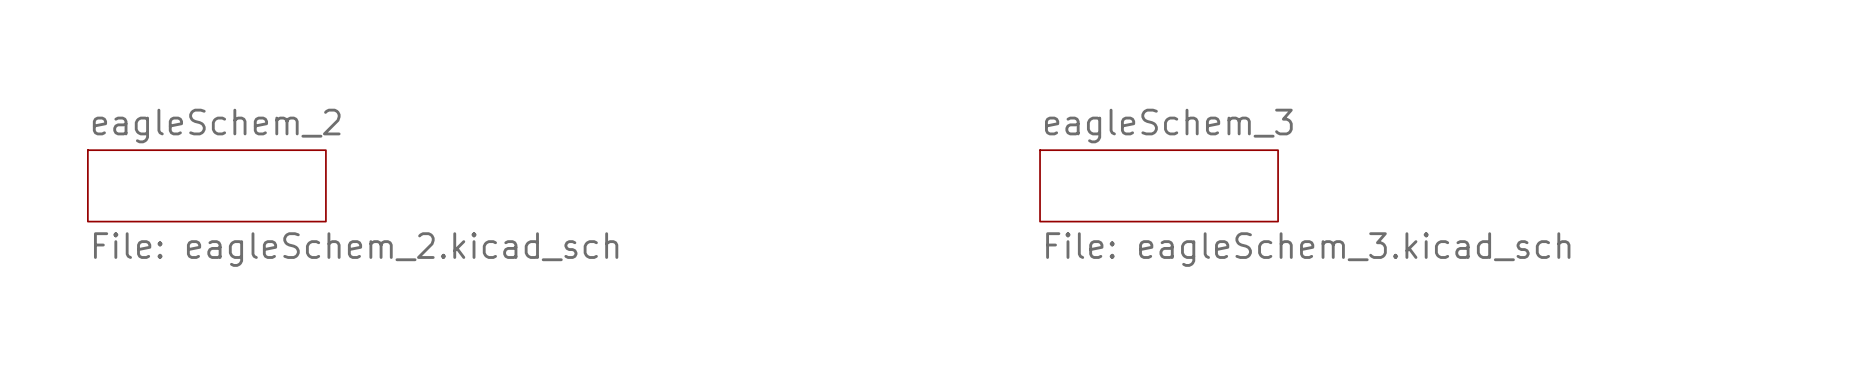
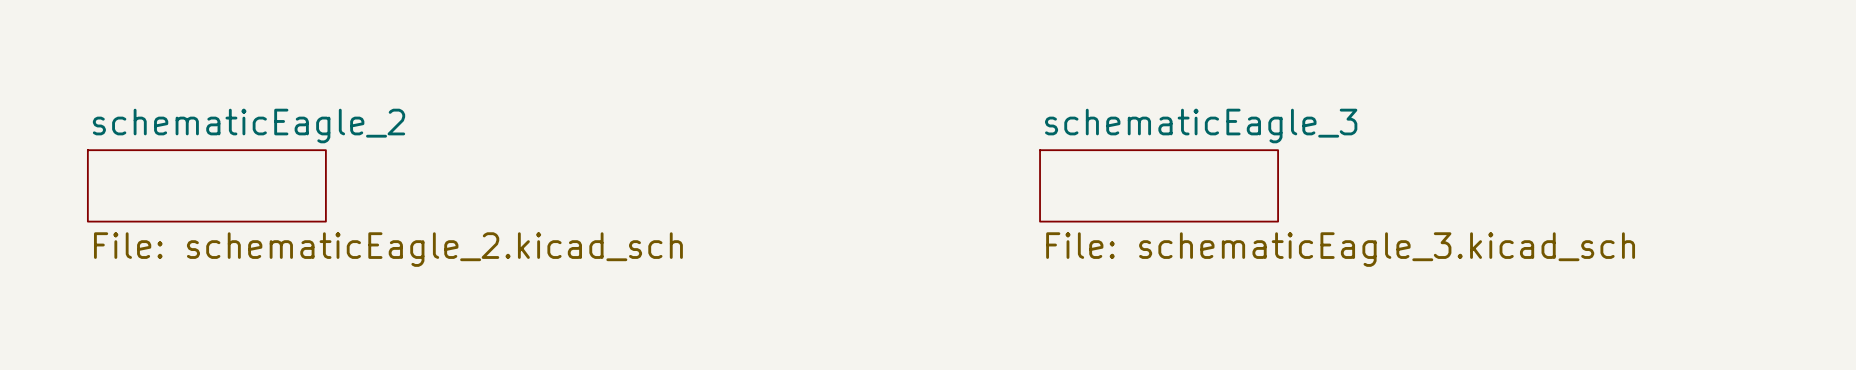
sheet eagleSchem_2 name: eagleSchem_2 (216, 126) -> schematicEagle_2 (249, 126)
sheet eagleSchem_3 name: eagleSchem_3 (1168, 126) -> schematicEagle_3 (1201, 126)
sheet eagleSchem_2 value: File: eagleSchem_2.kicad_sch (356, 249) -> File: schematicEagle_2.kicad_sch (388, 249)
sheet eagleSchem_3 value: File: eagleSchem_3.kicad_sch (1308, 249) -> File: schematicEagle_3.kicad_sch (1340, 249)

